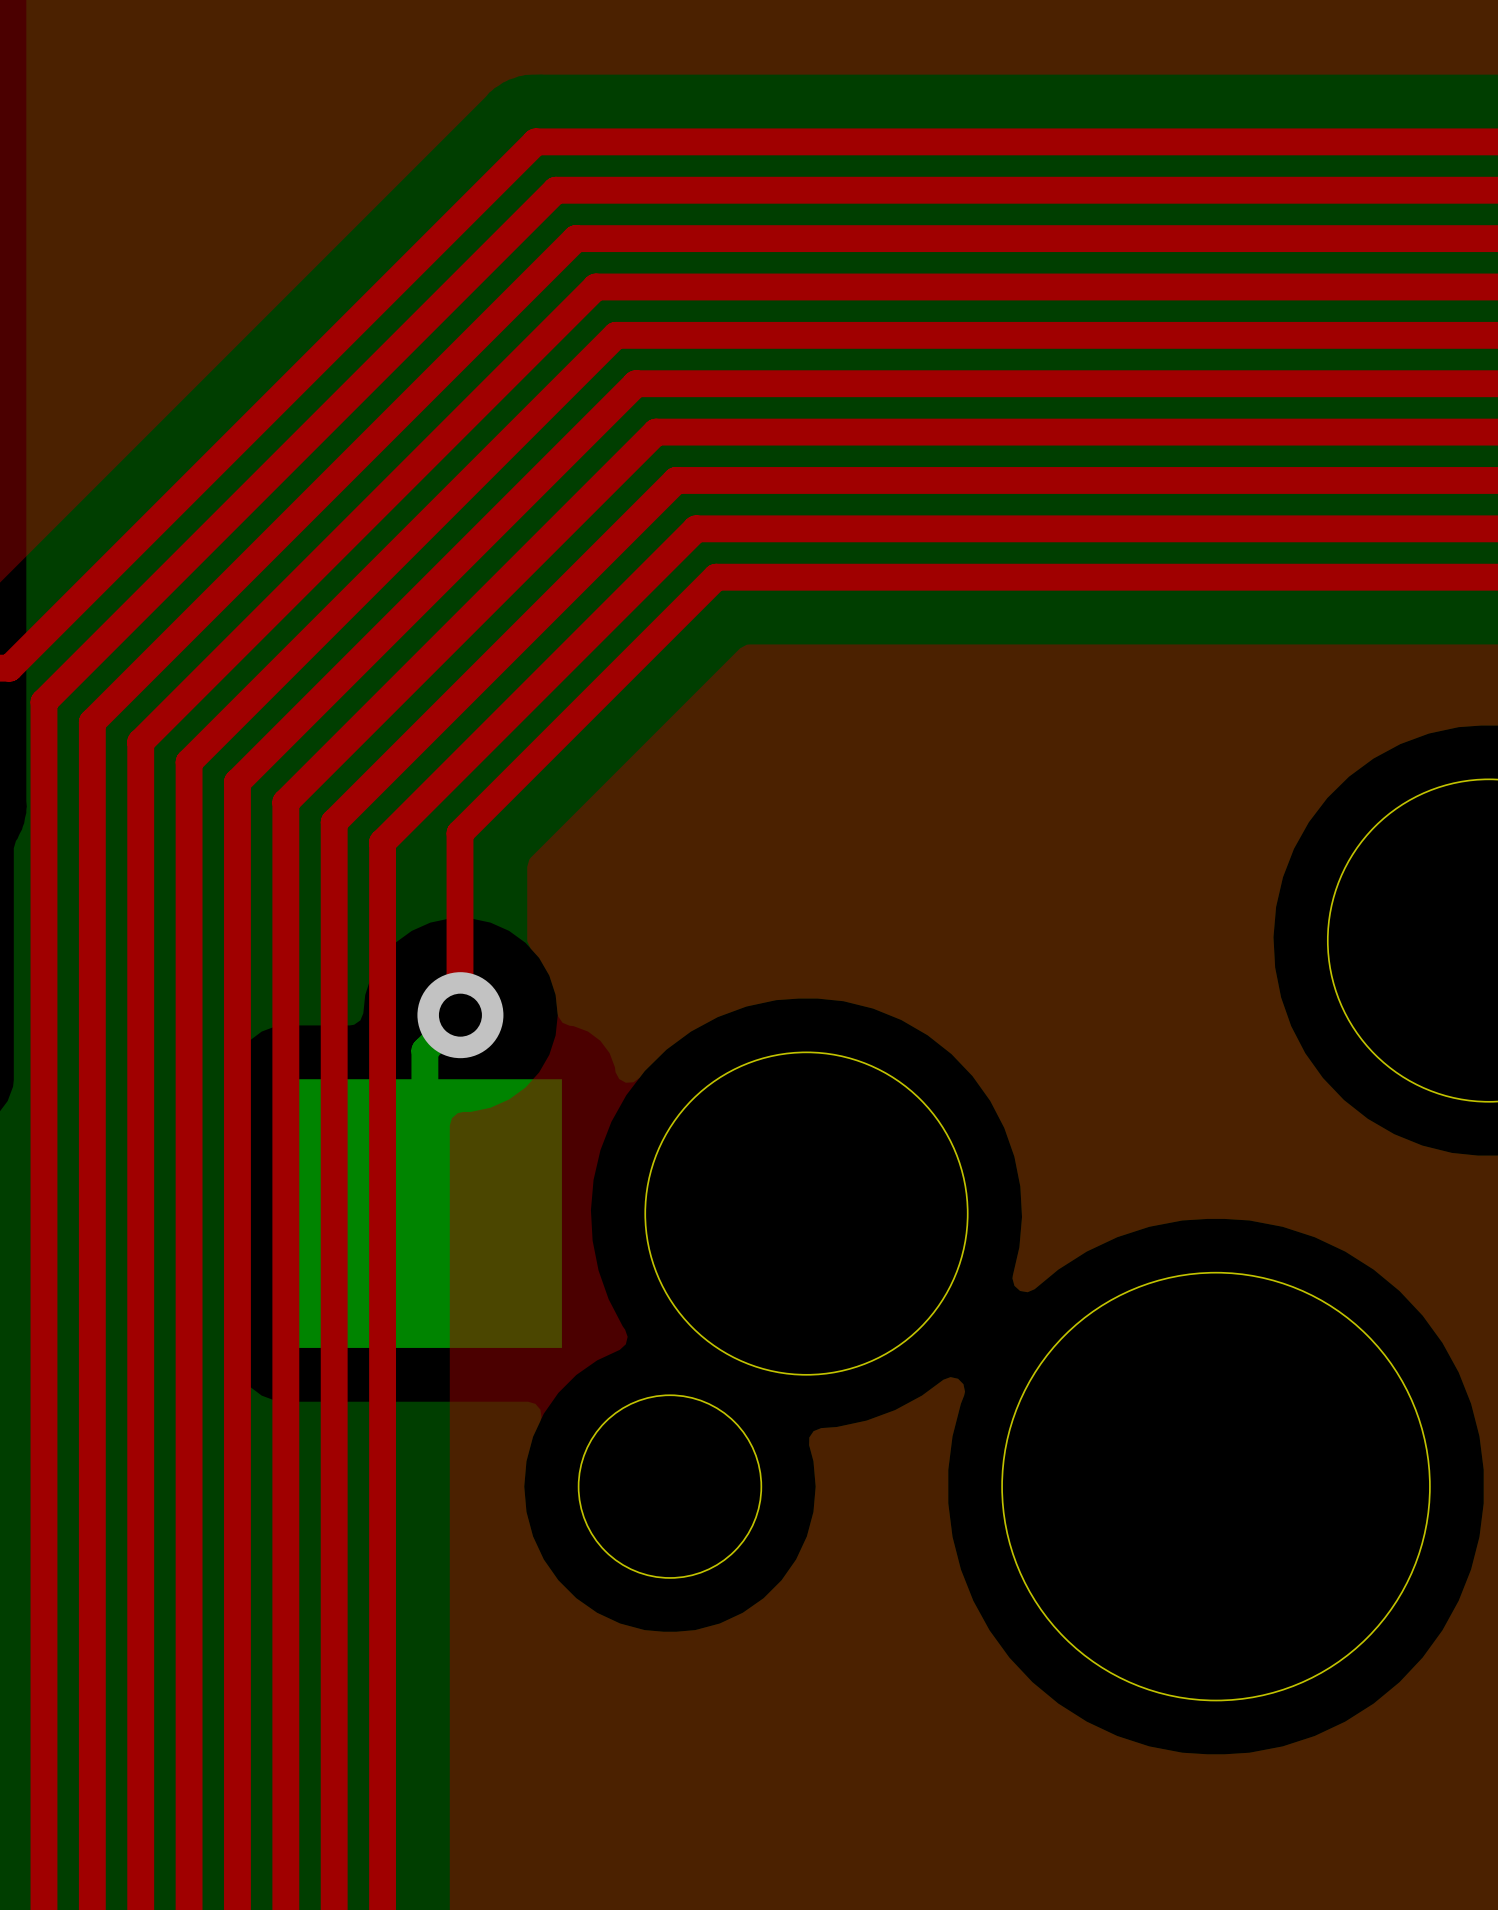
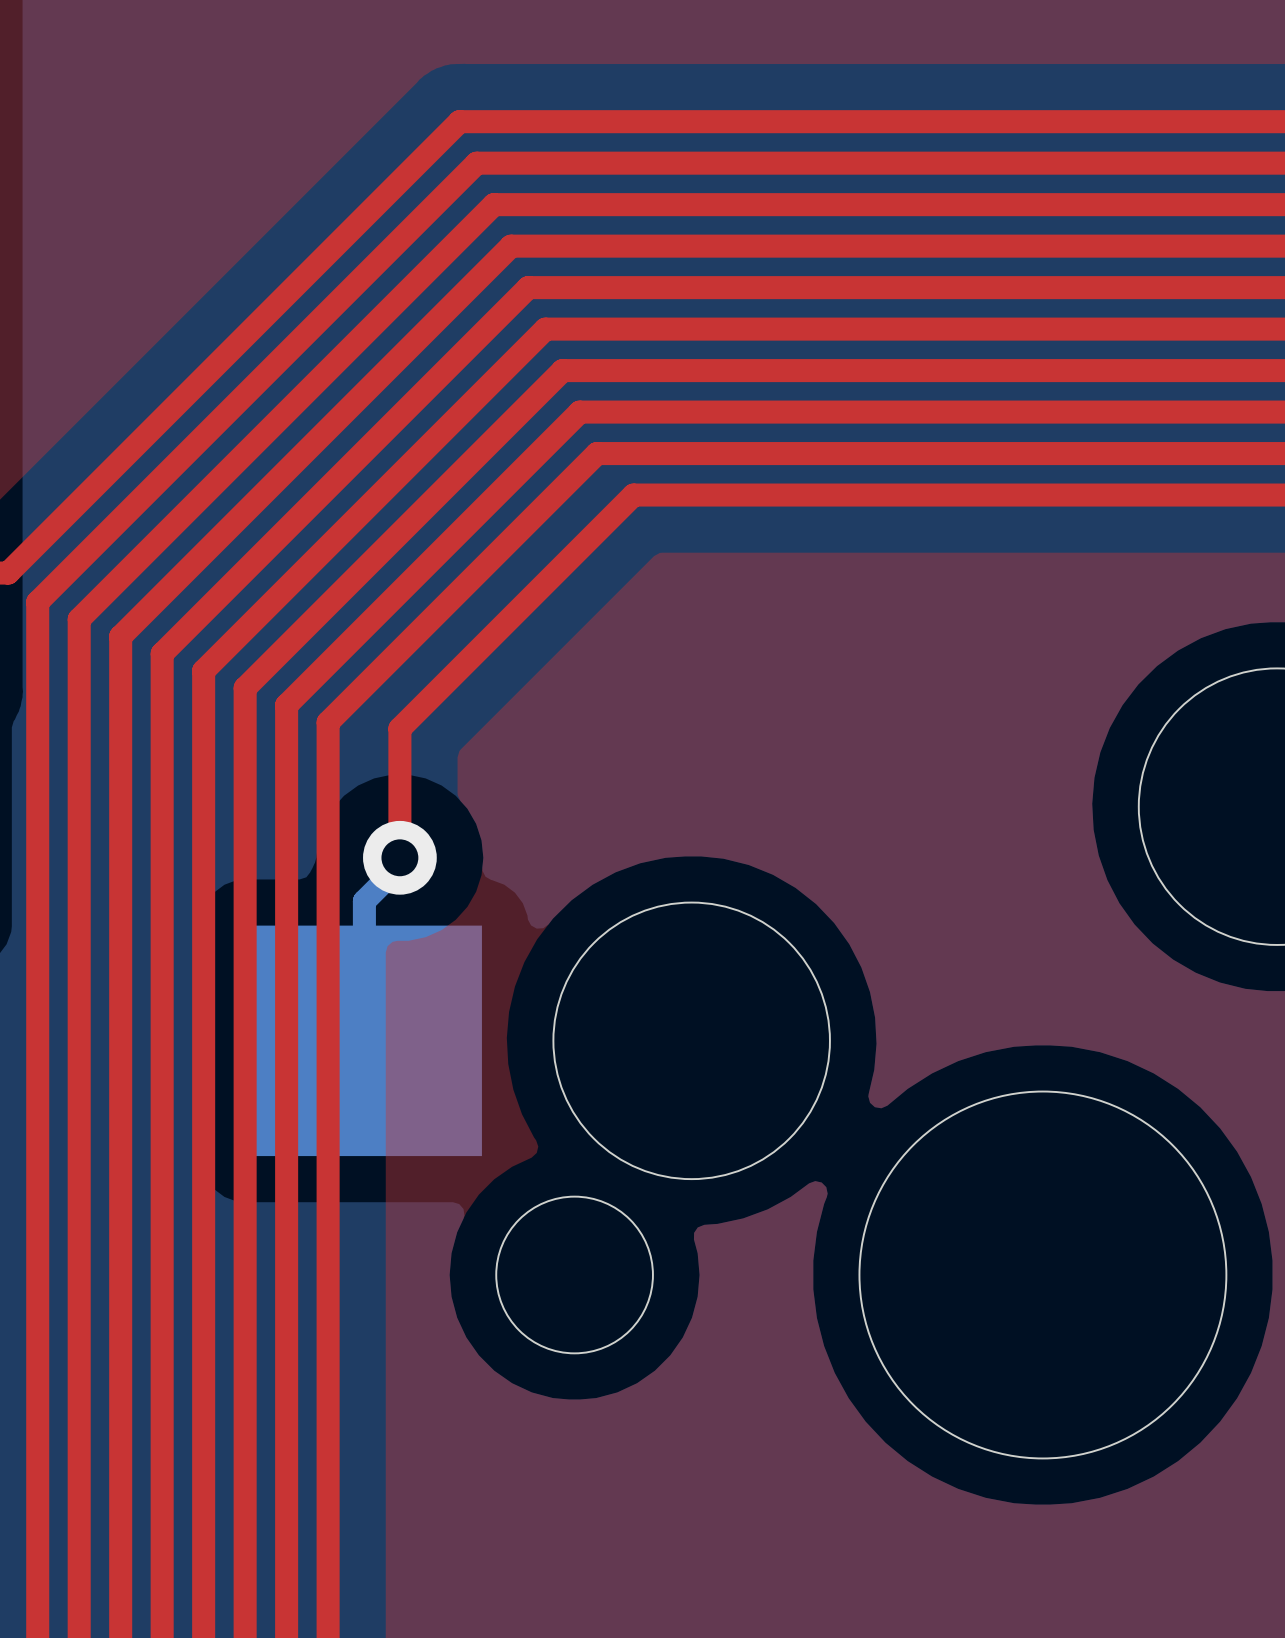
top track: (738, 577) (716, 577) (460, 833) (460, 1014) -> (633, 495) (399, 728) (399, 857)
via position: (460, 1015) -> (399, 857)

